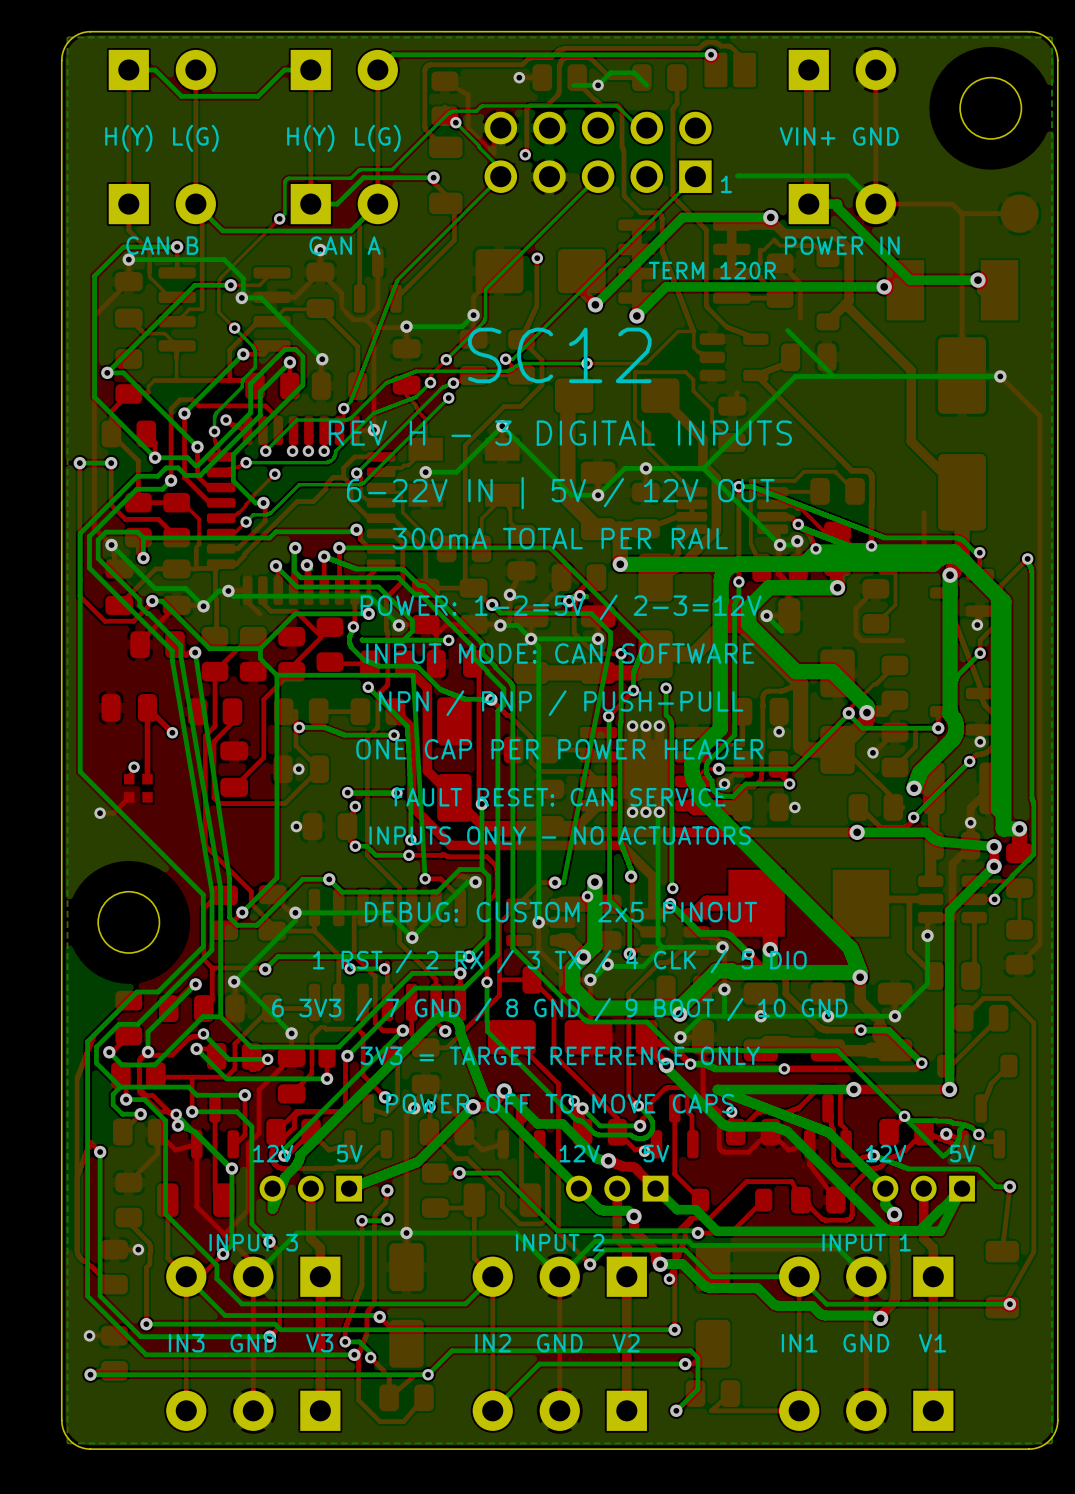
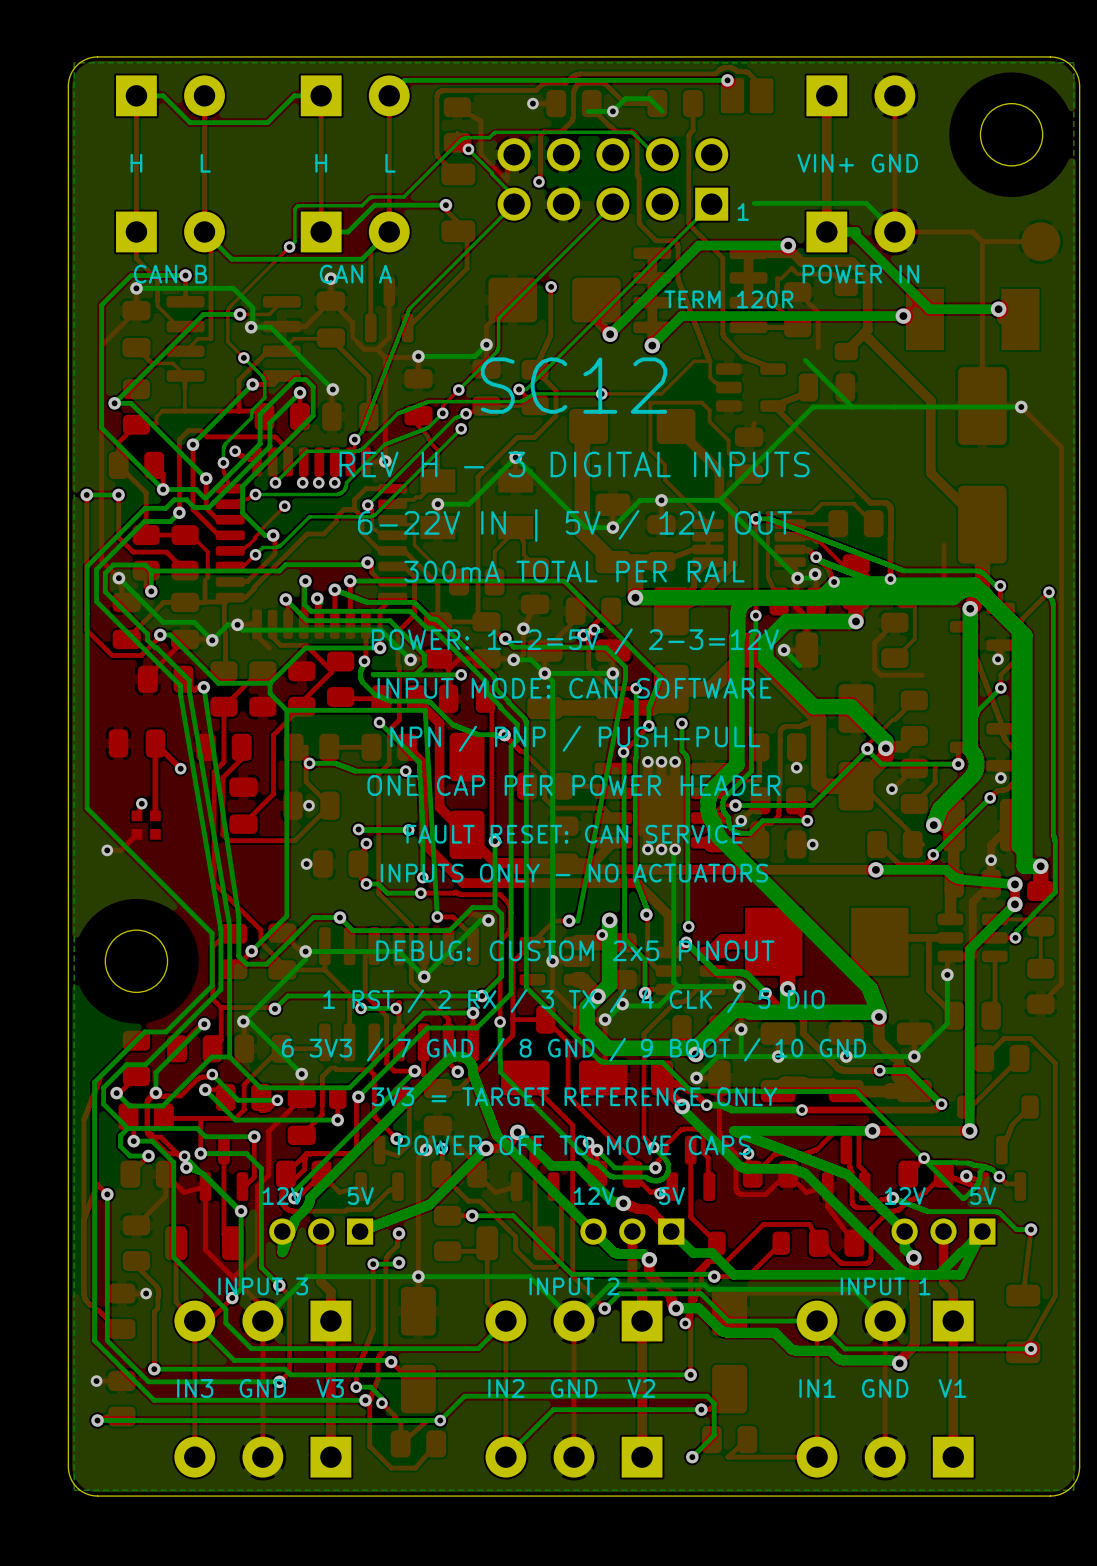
text: H(Y) (128, 138) -> H (136, 163)
text: L(G) (195, 138) -> L (205, 163)
text: H(Y) (310, 138) -> H (321, 163)
text: L(G) (377, 138) -> L (390, 163)

